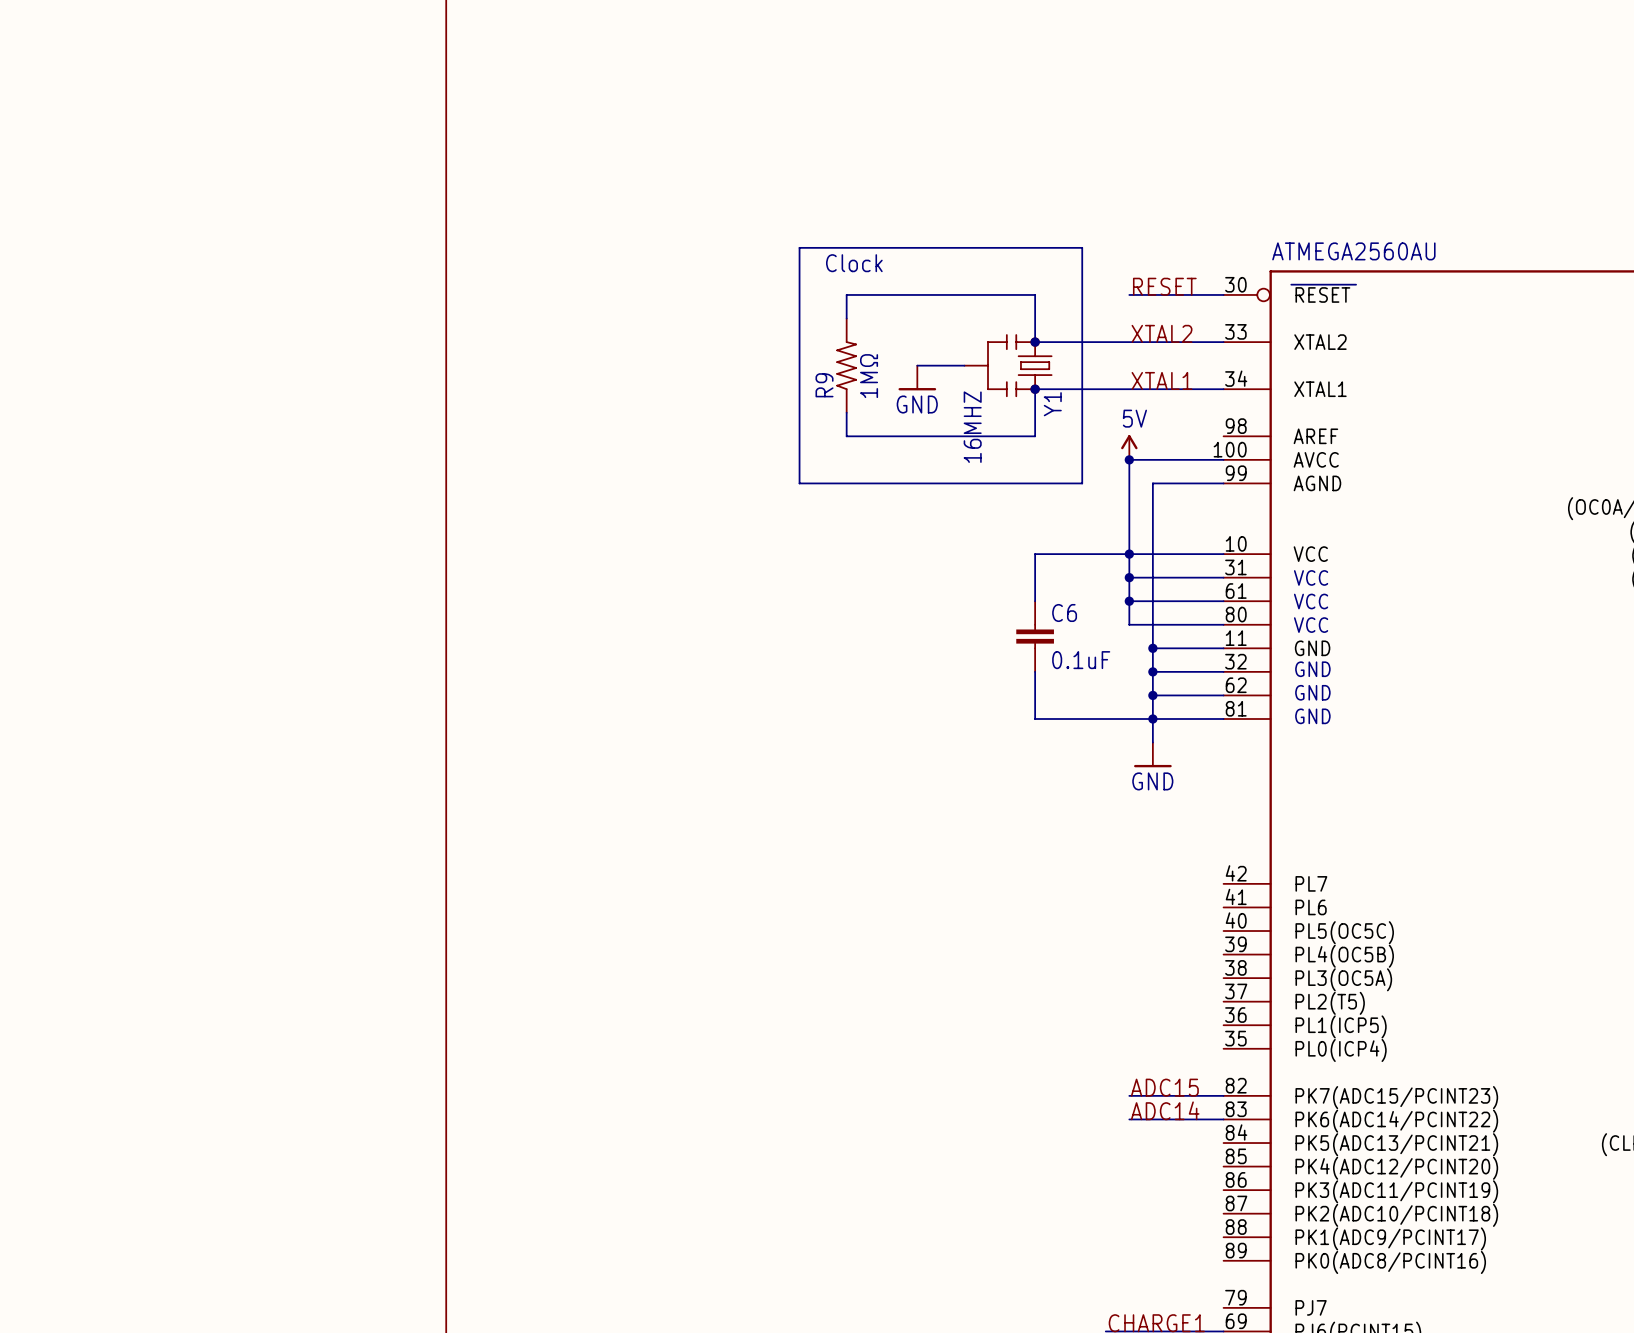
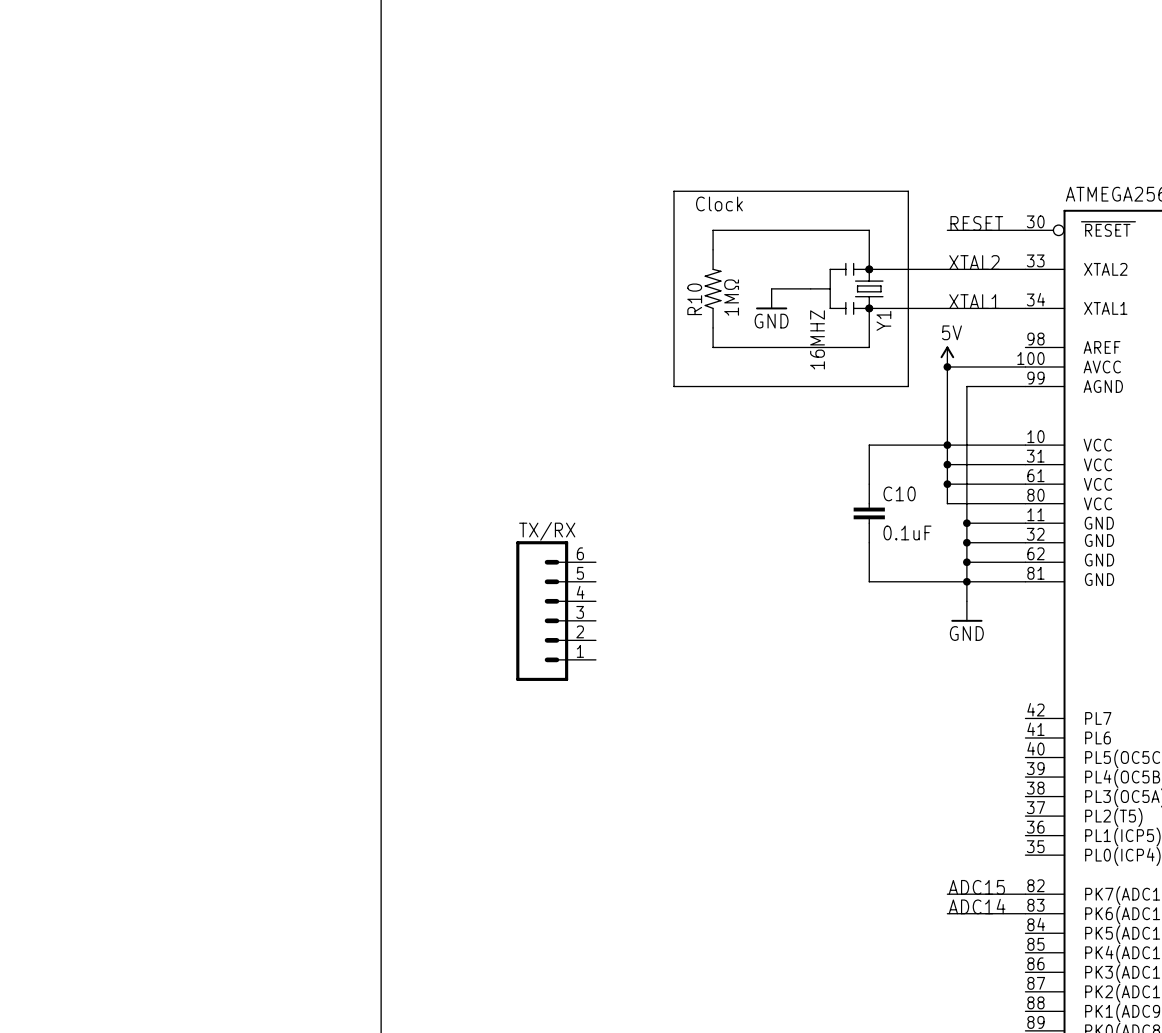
R9 name: R9 (824, 385) -> R10 (694, 299)
C6 name: C6 (1064, 612) -> C10 (899, 493)
TX/RX: none -> (556, 611)

